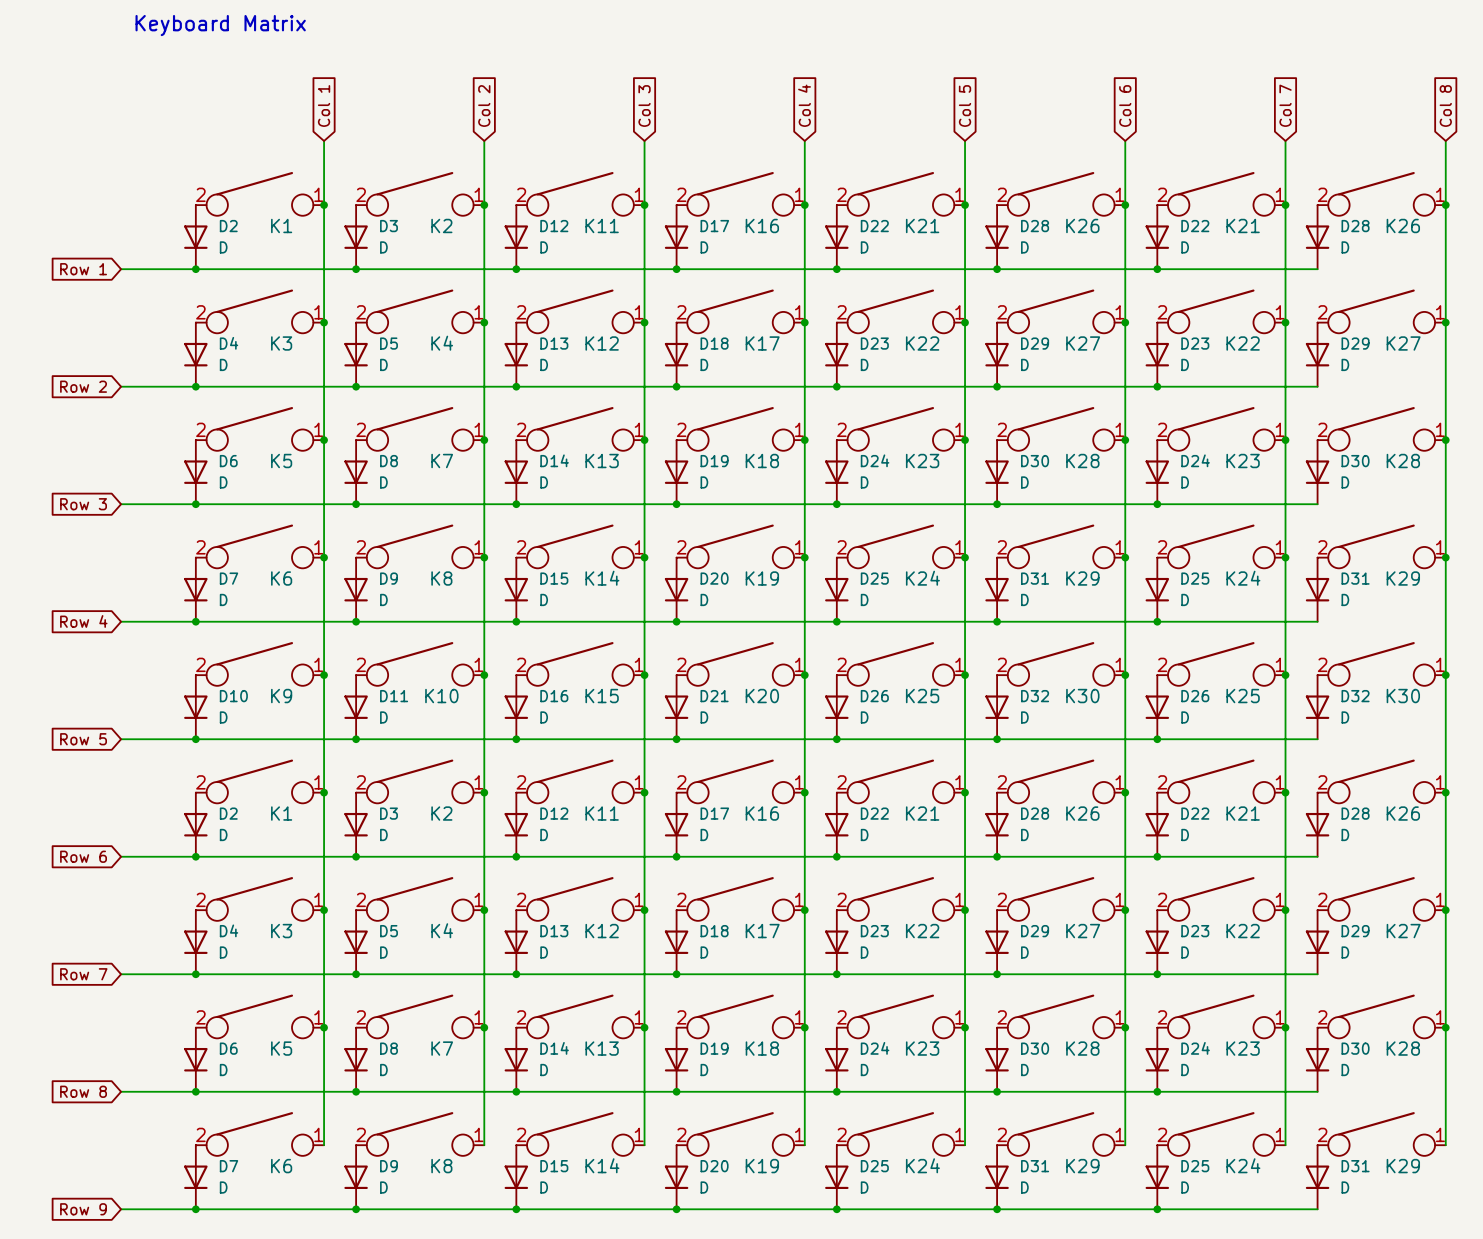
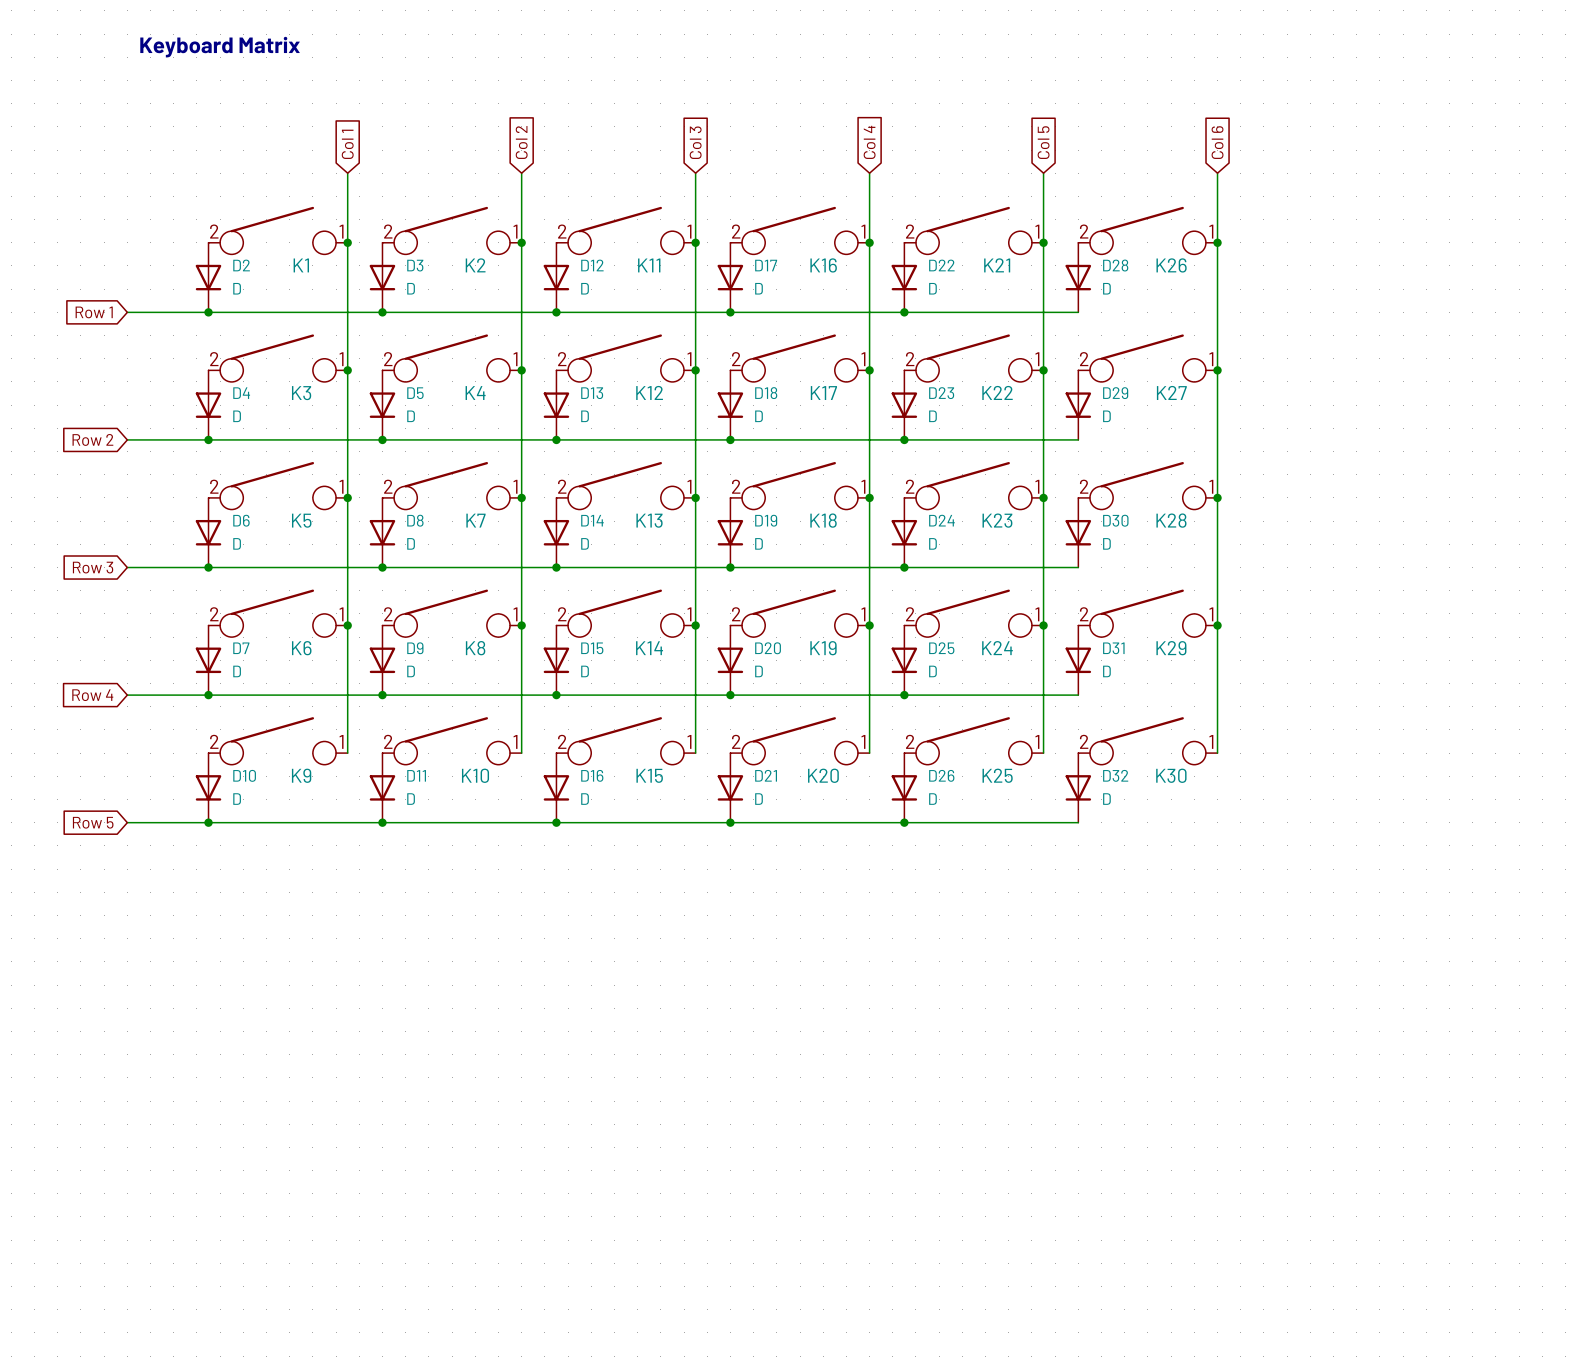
global label: Col 7 (1285, 105) -> none
global label: Col 8 (1445, 106) -> none
wire: (1285, 140) (1285, 1145) -> none
wire: (1445, 140) (1445, 1145) -> none
K21: (1221, 193) -> none
K26: (1381, 193) -> none
junction: (1285, 205) -> none
junction: (1445, 205) -> none
D22: D (1157, 237) -> none
D28: D (1317, 237) -> none
wire: (997, 269) (1317, 269) -> none
junction: (997, 269) -> none
junction: (1157, 269) -> none
K22: (1221, 311) -> none
K27: (1381, 311) -> none
junction: (1285, 322) -> none
junction: (1445, 322) -> none
D23: D (1157, 354) -> none
D29: D (1317, 354) -> none
wire: (997, 386) (1317, 386) -> none
junction: (997, 386) -> none
junction: (1157, 386) -> none
K23: (1221, 428) -> none
K28: (1381, 428) -> none
junction: (1285, 440) -> none
junction: (1445, 440) -> none
D24: D (1157, 472) -> none
D30: D (1317, 472) -> none
wire: (997, 504) (1317, 504) -> none
junction: (997, 504) -> none
junction: (1157, 504) -> none
K24: (1221, 546) -> none
K29: (1381, 546) -> none
junction: (1285, 557) -> none
junction: (1445, 557) -> none
D25: D (1157, 589) -> none
D31: D (1317, 589) -> none
wire: (997, 621) (1317, 621) -> none
junction: (997, 621) -> none
junction: (1157, 621) -> none
K25: (1221, 663) -> none
K30: (1381, 663) -> none
wire: (324, 675) (324, 1145) -> none
junction: (324, 675) -> none
wire: (484, 675) (484, 1145) -> none
junction: (484, 675) -> none
wire: (644, 675) (644, 1145) -> none
junction: (644, 675) -> none
wire: (804, 675) (804, 1145) -> none
junction: (804, 675) -> none
wire: (965, 675) (965, 1145) -> none
junction: (965, 675) -> none
wire: (1125, 675) (1125, 1145) -> none
junction: (1125, 675) -> none
junction: (1285, 675) -> none
junction: (1445, 675) -> none
D26: D (1157, 707) -> none
D32: D (1317, 707) -> none
wire: (997, 739) (1317, 739) -> none
junction: (997, 739) -> none
junction: (1157, 739) -> none
K1: (259, 781) -> none
K2: (420, 781) -> none
K11: (580, 781) -> none
K16: (740, 781) -> none
K21: (900, 781) -> none
K26: (1061, 781) -> none
K21: (1221, 781) -> none
K26: (1381, 781) -> none
junction: (324, 792) -> none
junction: (484, 792) -> none
junction: (644, 792) -> none
junction: (804, 792) -> none
junction: (965, 792) -> none
junction: (1125, 792) -> none
junction: (1285, 792) -> none
junction: (1445, 792) -> none
D2: D (195, 824) -> none
D3: D (356, 824) -> none
D12: D (516, 824) -> none
D17: D (676, 824) -> none
D22: D (836, 824) -> none
D28: D (997, 824) -> none
D22: D (1157, 824) -> none
D28: D (1317, 824) -> none
global label: Row 6 (83, 856) -> none
wire: (121, 856) (1317, 856) -> none
junction: (195, 856) -> none
junction: (356, 856) -> none
junction: (516, 856) -> none
junction: (676, 856) -> none
junction: (836, 856) -> none
junction: (997, 856) -> none
junction: (1157, 856) -> none
K3: (259, 898) -> none
K4: (420, 898) -> none
K12: (580, 898) -> none
K17: (740, 898) -> none
K22: (900, 898) -> none
K27: (1061, 898) -> none
K22: (1221, 898) -> none
K27: (1381, 898) -> none
junction: (324, 910) -> none
junction: (484, 910) -> none
junction: (644, 910) -> none
junction: (804, 910) -> none
junction: (965, 910) -> none
junction: (1125, 910) -> none
junction: (1285, 910) -> none
junction: (1445, 910) -> none
D4: D (195, 942) -> none
D5: D (356, 942) -> none
D13: D (516, 942) -> none
D18: D (676, 942) -> none
D23: D (836, 942) -> none
D29: D (997, 942) -> none
D23: D (1157, 942) -> none
D29: D (1317, 942) -> none
global label: Row 7 (83, 974) -> none
wire: (121, 974) (1317, 974) -> none
junction: (195, 974) -> none
junction: (356, 974) -> none
junction: (516, 974) -> none
junction: (676, 974) -> none
junction: (836, 974) -> none
junction: (997, 974) -> none
junction: (1157, 974) -> none
K5: (259, 1016) -> none
K7: (420, 1016) -> none
K13: (580, 1016) -> none
K18: (740, 1016) -> none
K23: (900, 1016) -> none
K28: (1061, 1016) -> none
K23: (1221, 1016) -> none
K28: (1381, 1016) -> none
junction: (324, 1027) -> none
junction: (484, 1027) -> none
junction: (644, 1027) -> none
junction: (804, 1027) -> none
junction: (965, 1027) -> none
junction: (1125, 1027) -> none
junction: (1285, 1027) -> none
junction: (1445, 1027) -> none
D6: D (195, 1059) -> none
D8: D (356, 1059) -> none
D14: D (516, 1059) -> none
D19: D (676, 1059) -> none
D24: D (836, 1059) -> none
D30: D (997, 1059) -> none
D24: D (1157, 1059) -> none
D30: D (1317, 1059) -> none
global label: Row 8 (83, 1091) -> none
wire: (121, 1091) (1317, 1091) -> none
junction: (195, 1091) -> none
junction: (356, 1091) -> none
junction: (516, 1091) -> none
junction: (676, 1091) -> none
junction: (836, 1091) -> none
junction: (997, 1091) -> none
junction: (1157, 1091) -> none
K6: (259, 1133) -> none
K8: (420, 1133) -> none
K14: (580, 1133) -> none
K19: (740, 1133) -> none
K24: (900, 1133) -> none
K29: (1061, 1133) -> none
K24: (1221, 1133) -> none
K29: (1381, 1133) -> none
D7: D (195, 1177) -> none
D9: D (356, 1177) -> none
D15: D (516, 1177) -> none
D20: D (676, 1177) -> none
D25: D (836, 1177) -> none
D31: D (997, 1177) -> none
D25: D (1157, 1177) -> none
D31: D (1317, 1177) -> none
global label: Row 9 (83, 1209) -> none
wire: (121, 1209) (1317, 1209) -> none
junction: (195, 1209) -> none
junction: (356, 1209) -> none
junction: (516, 1209) -> none
junction: (676, 1209) -> none
junction: (836, 1209) -> none
junction: (997, 1209) -> none
junction: (1157, 1209) -> none

